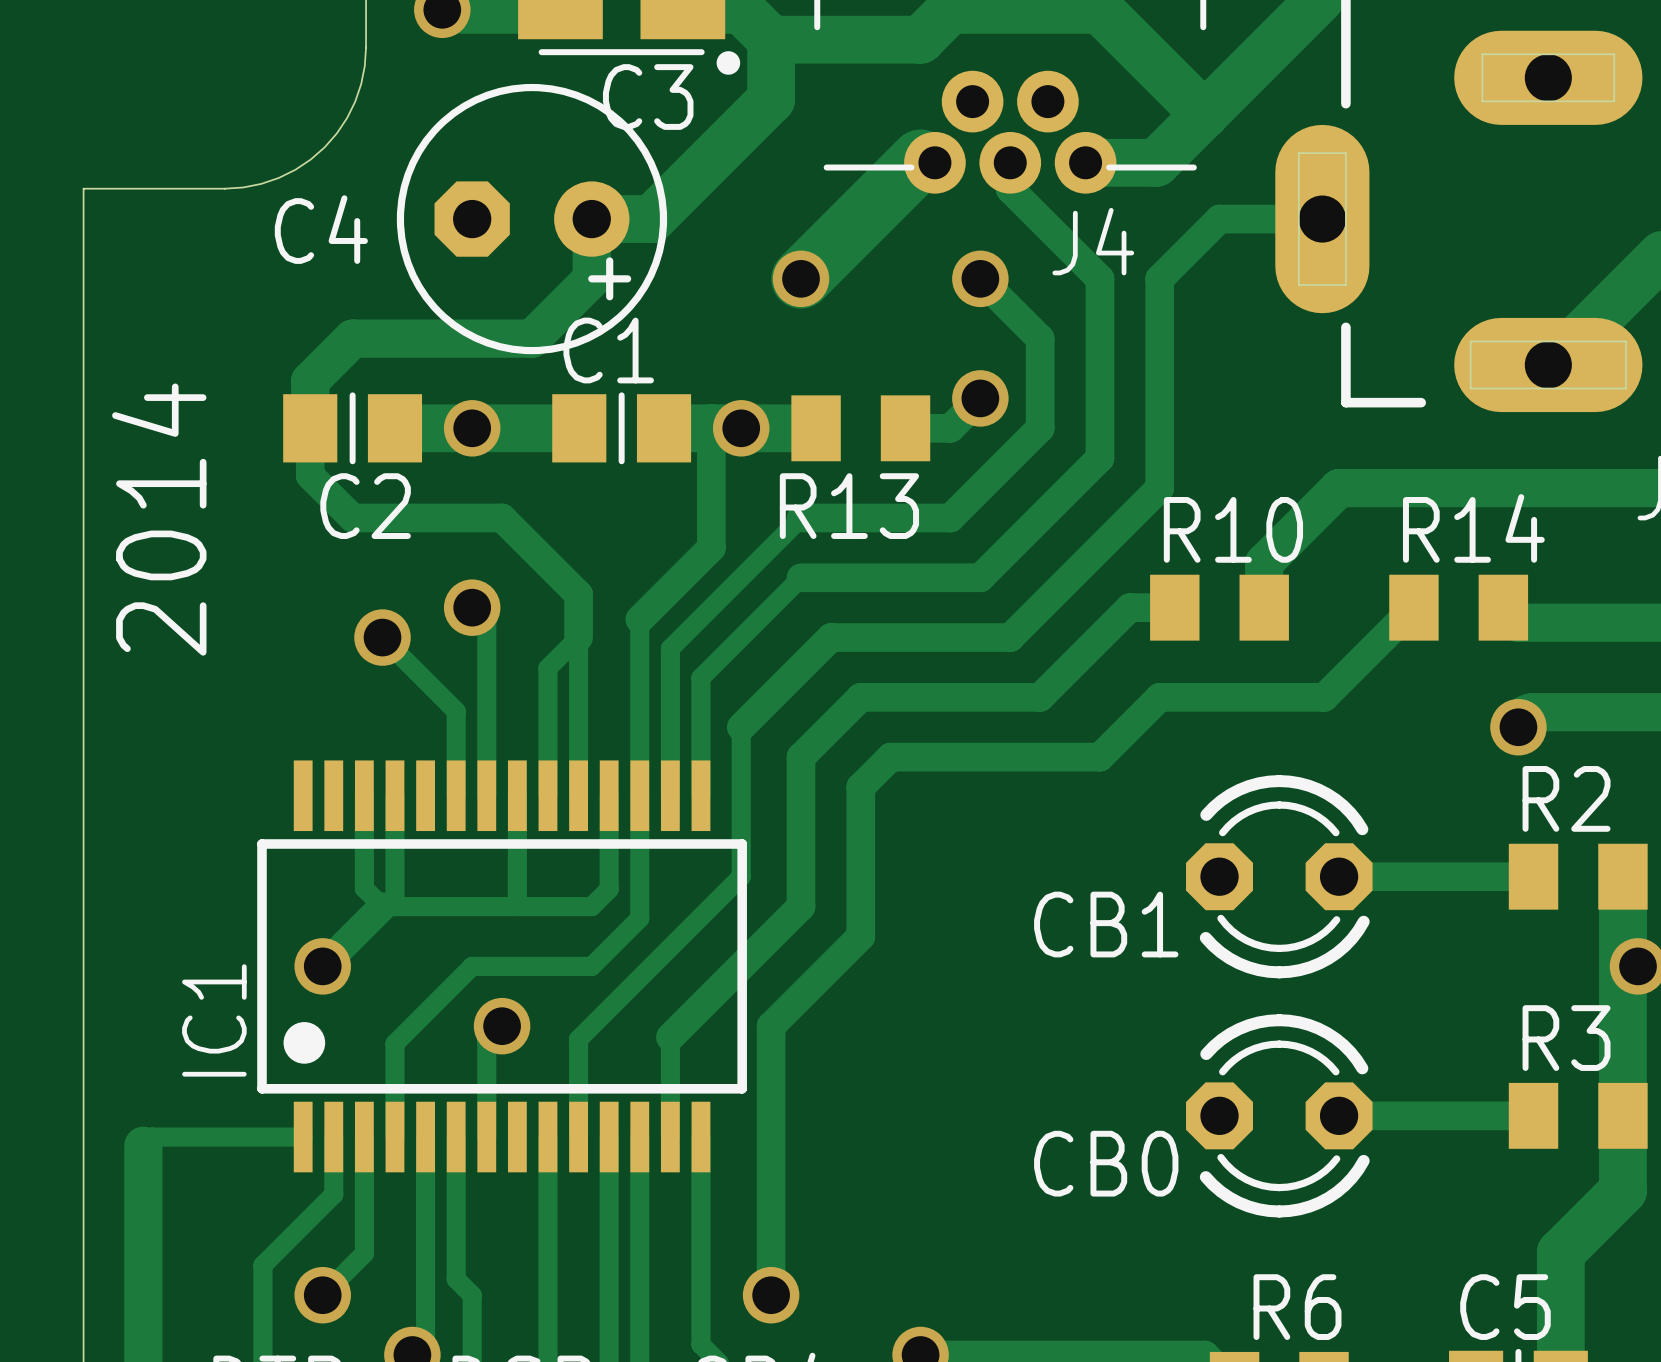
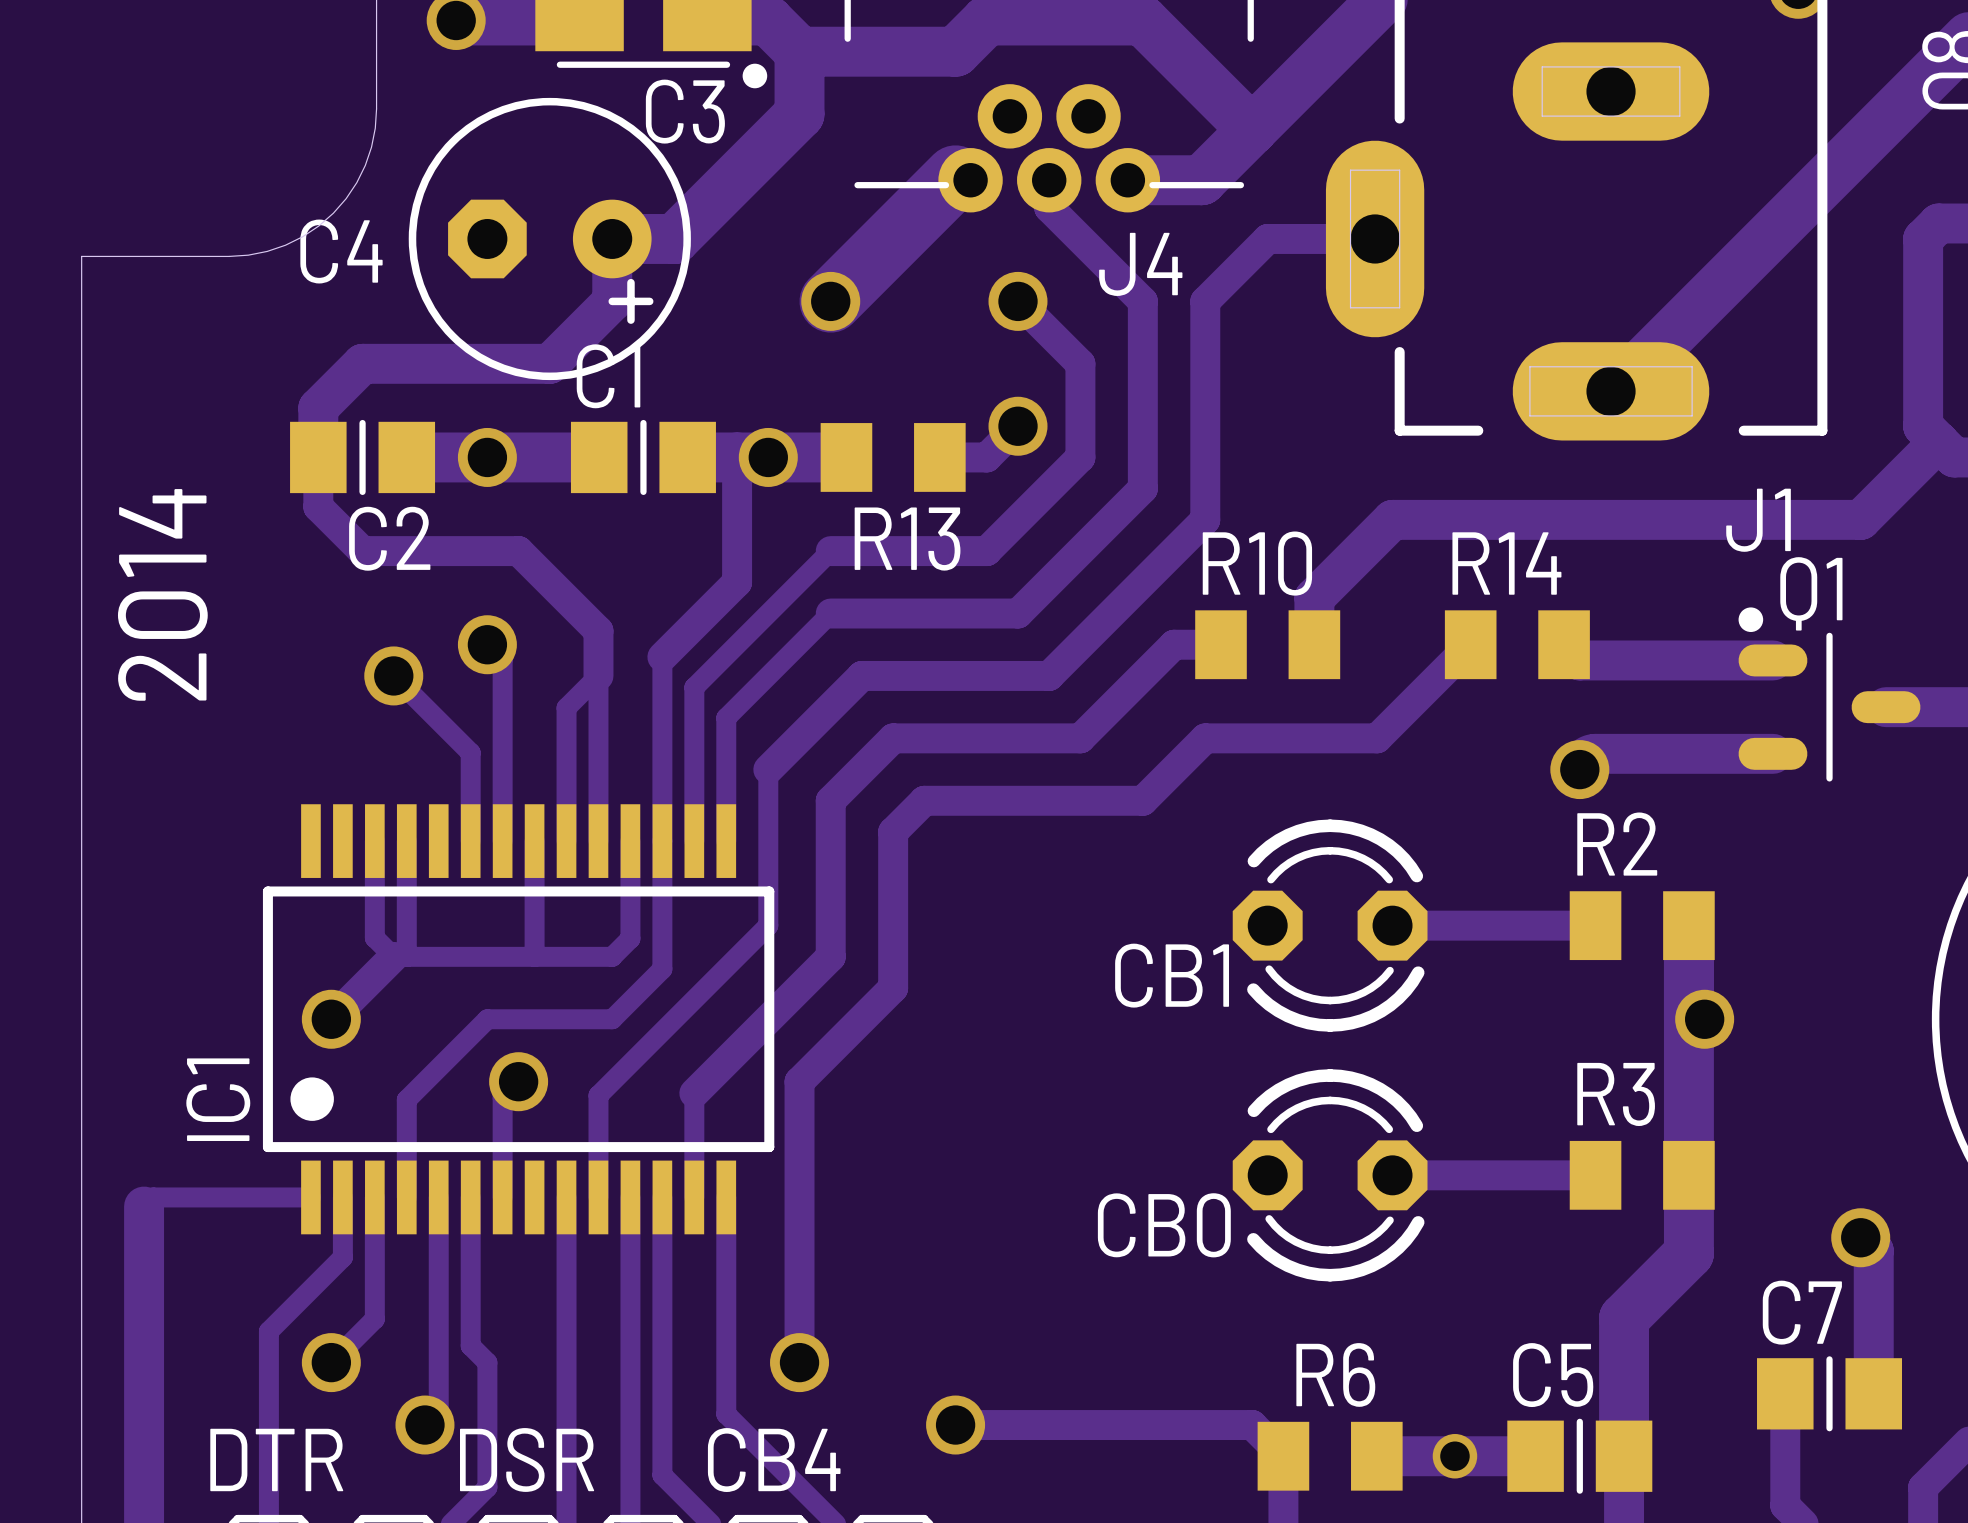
board edge: (366, 47) (361, 84) (347, 118) (324, 147) (295, 169) (261, 183) (243, 187) (83, 188) (83, 235) -> (376, 59) (375, 128) (365, 165) (346, 198) (318, 225) (302, 236) (267, 251) (248, 255) (81, 256)

